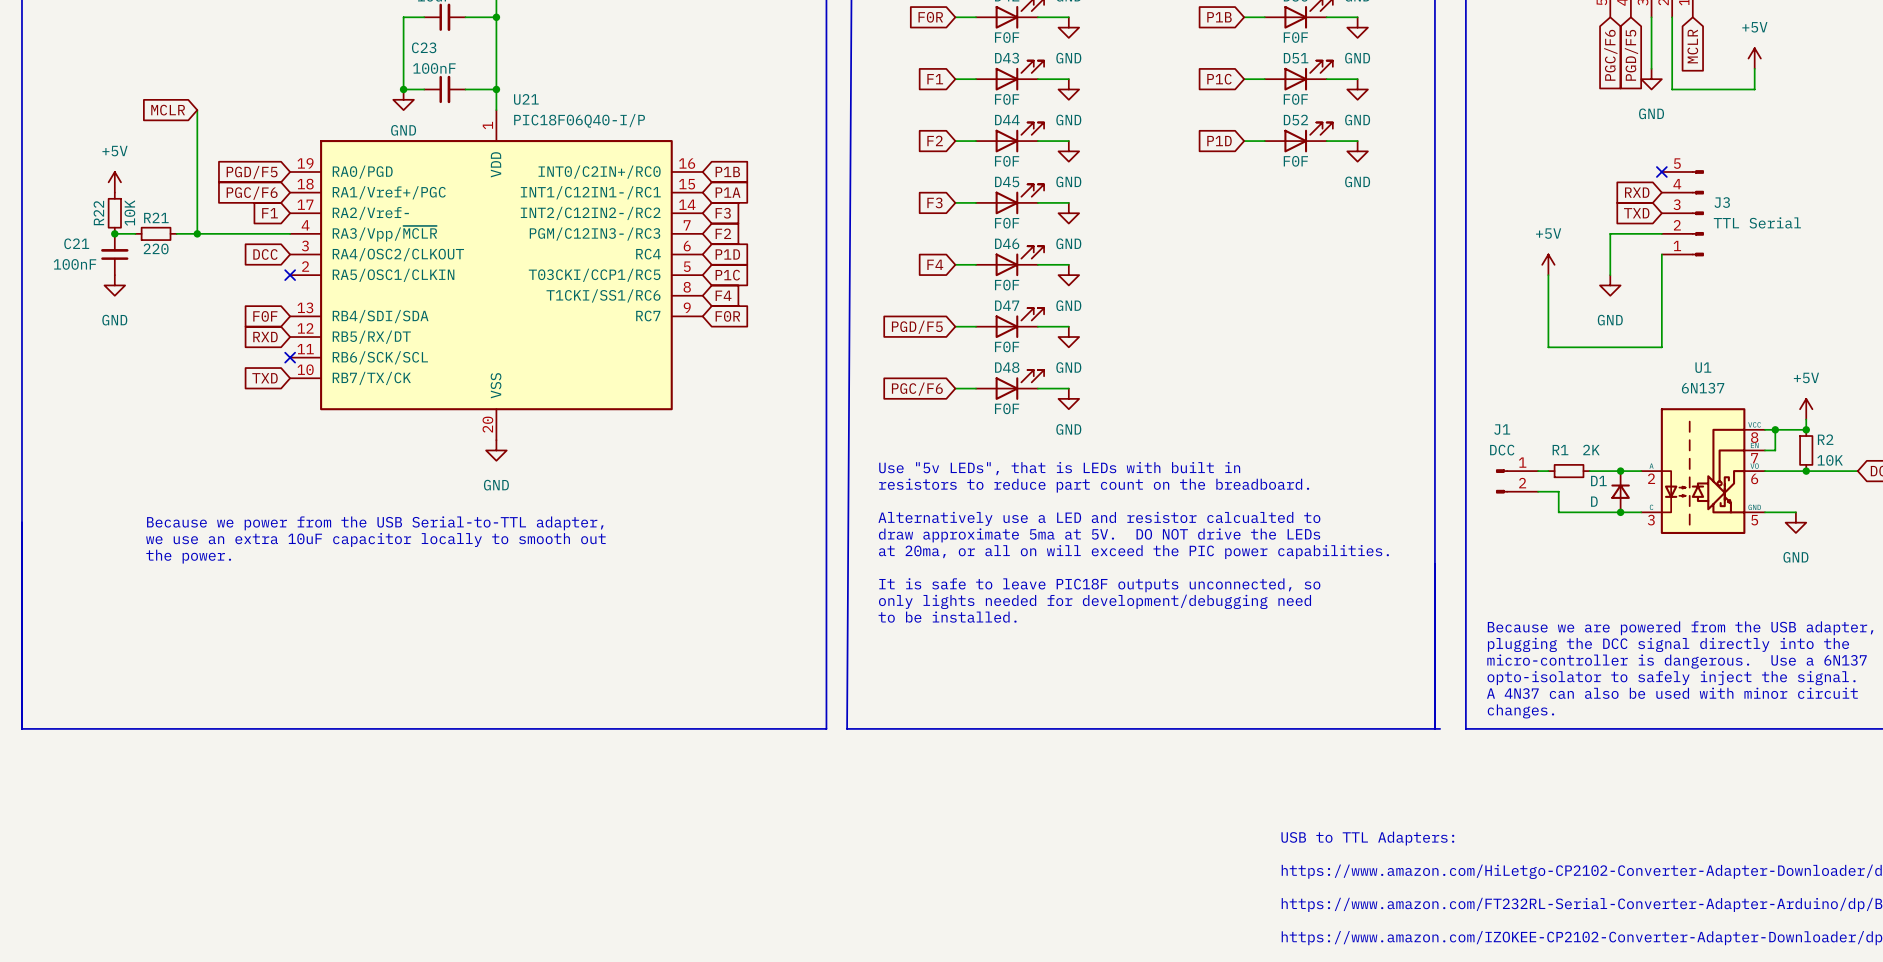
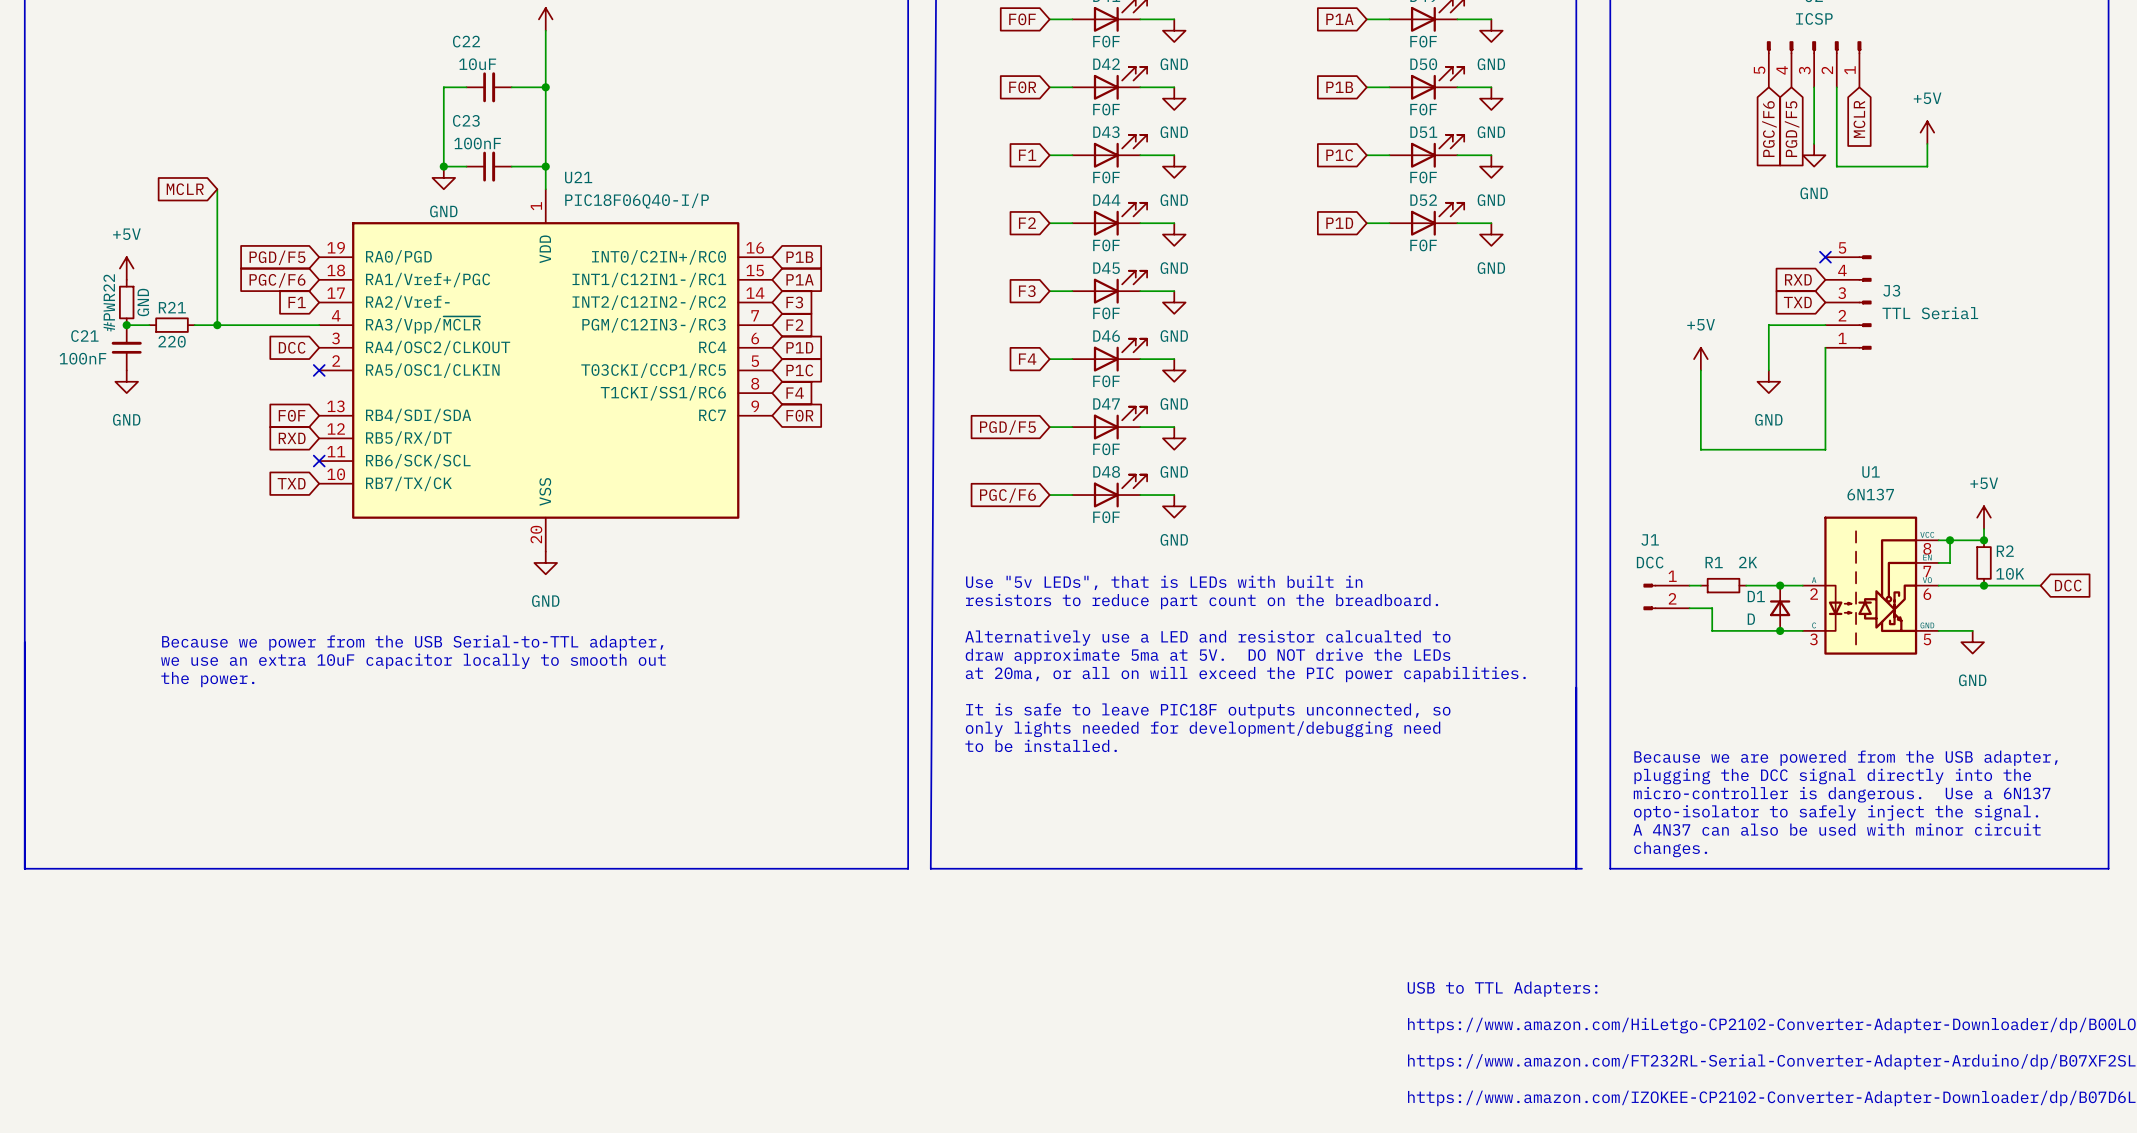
R22: 10K (114, 213) -> none
#PWR22: none -> GND (126, 302)

